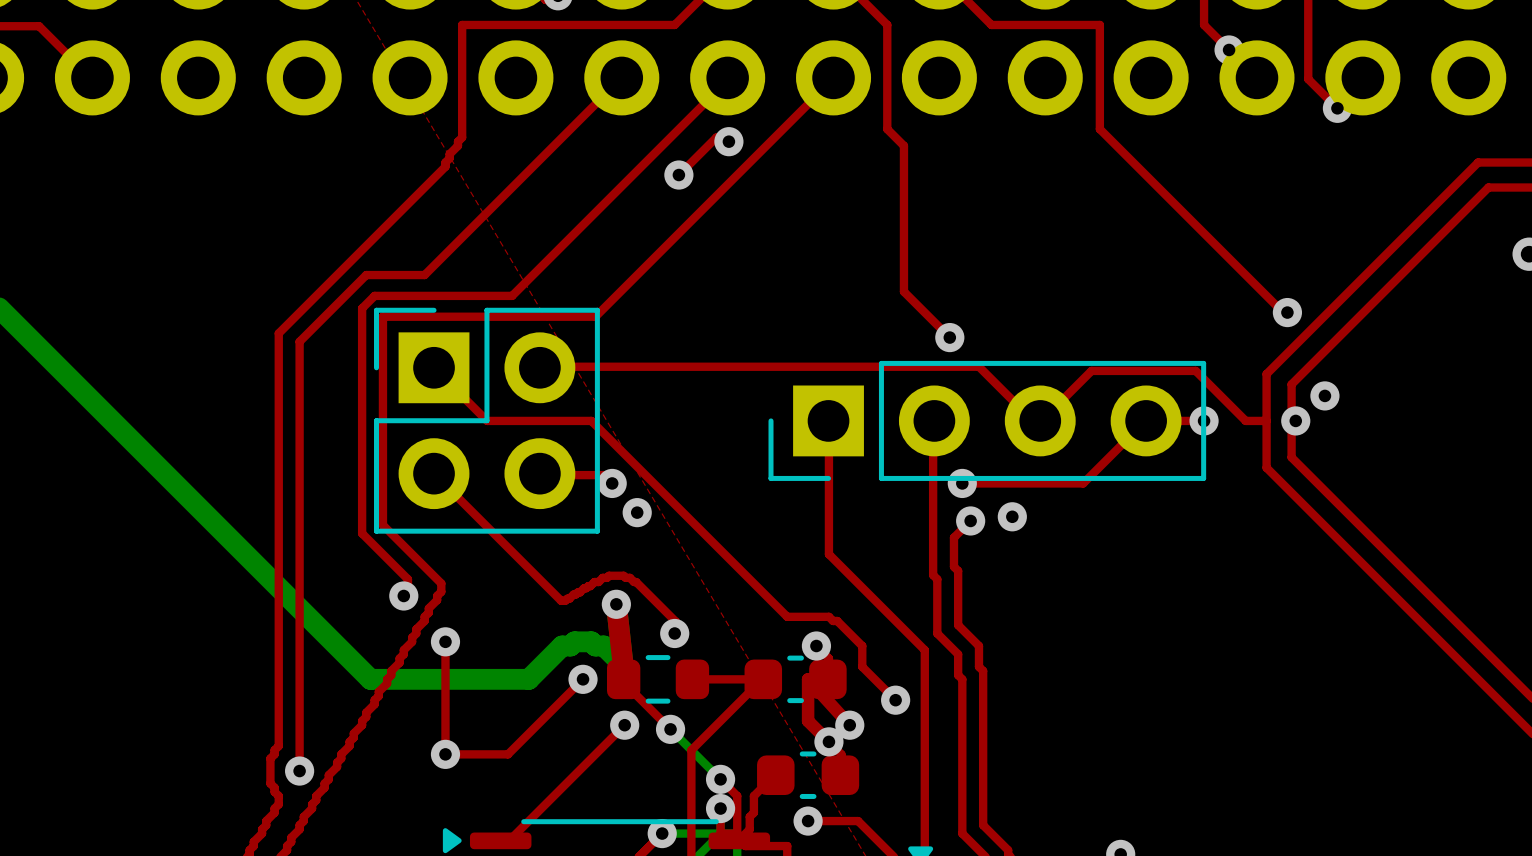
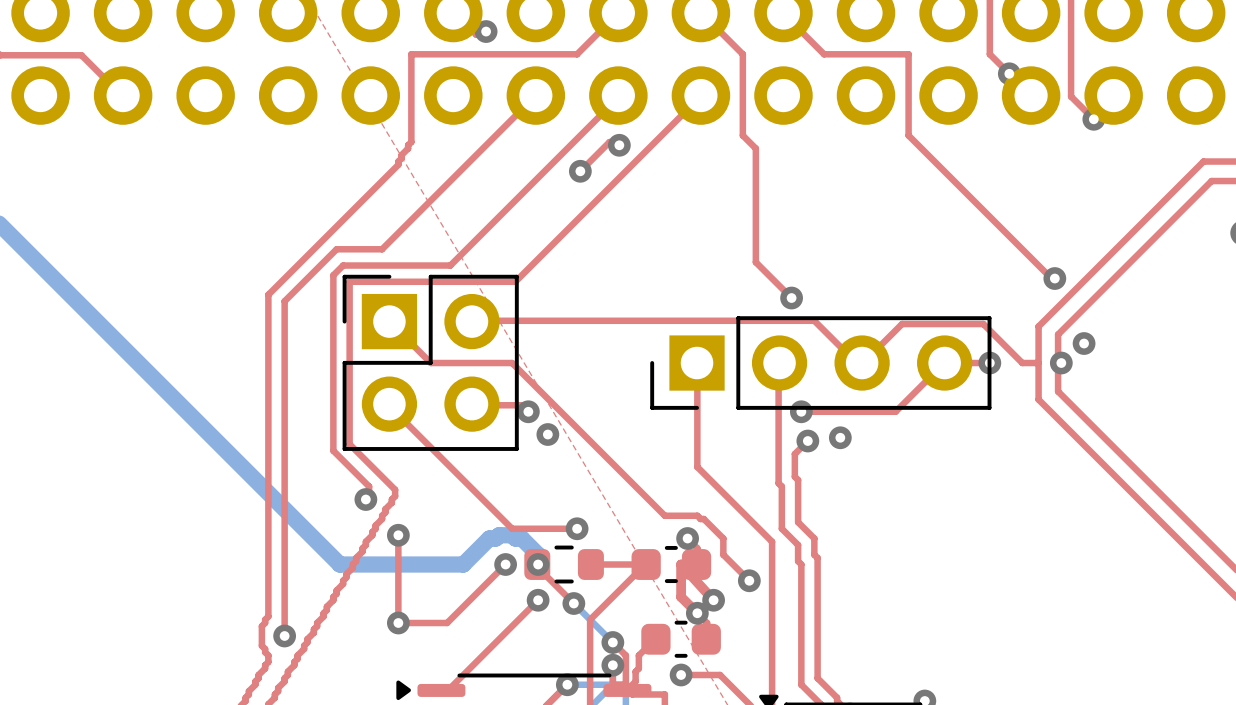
top track: (432, 475) (434, 473) (561, 600) (569, 598) (602, 577) (623, 575) (636, 582) (675, 621) (674, 633) -> (388, 405) (512, 528) (577, 528)
top track: (616, 604) (624, 679) -> none
via position: (616, 604) -> (538, 564)

